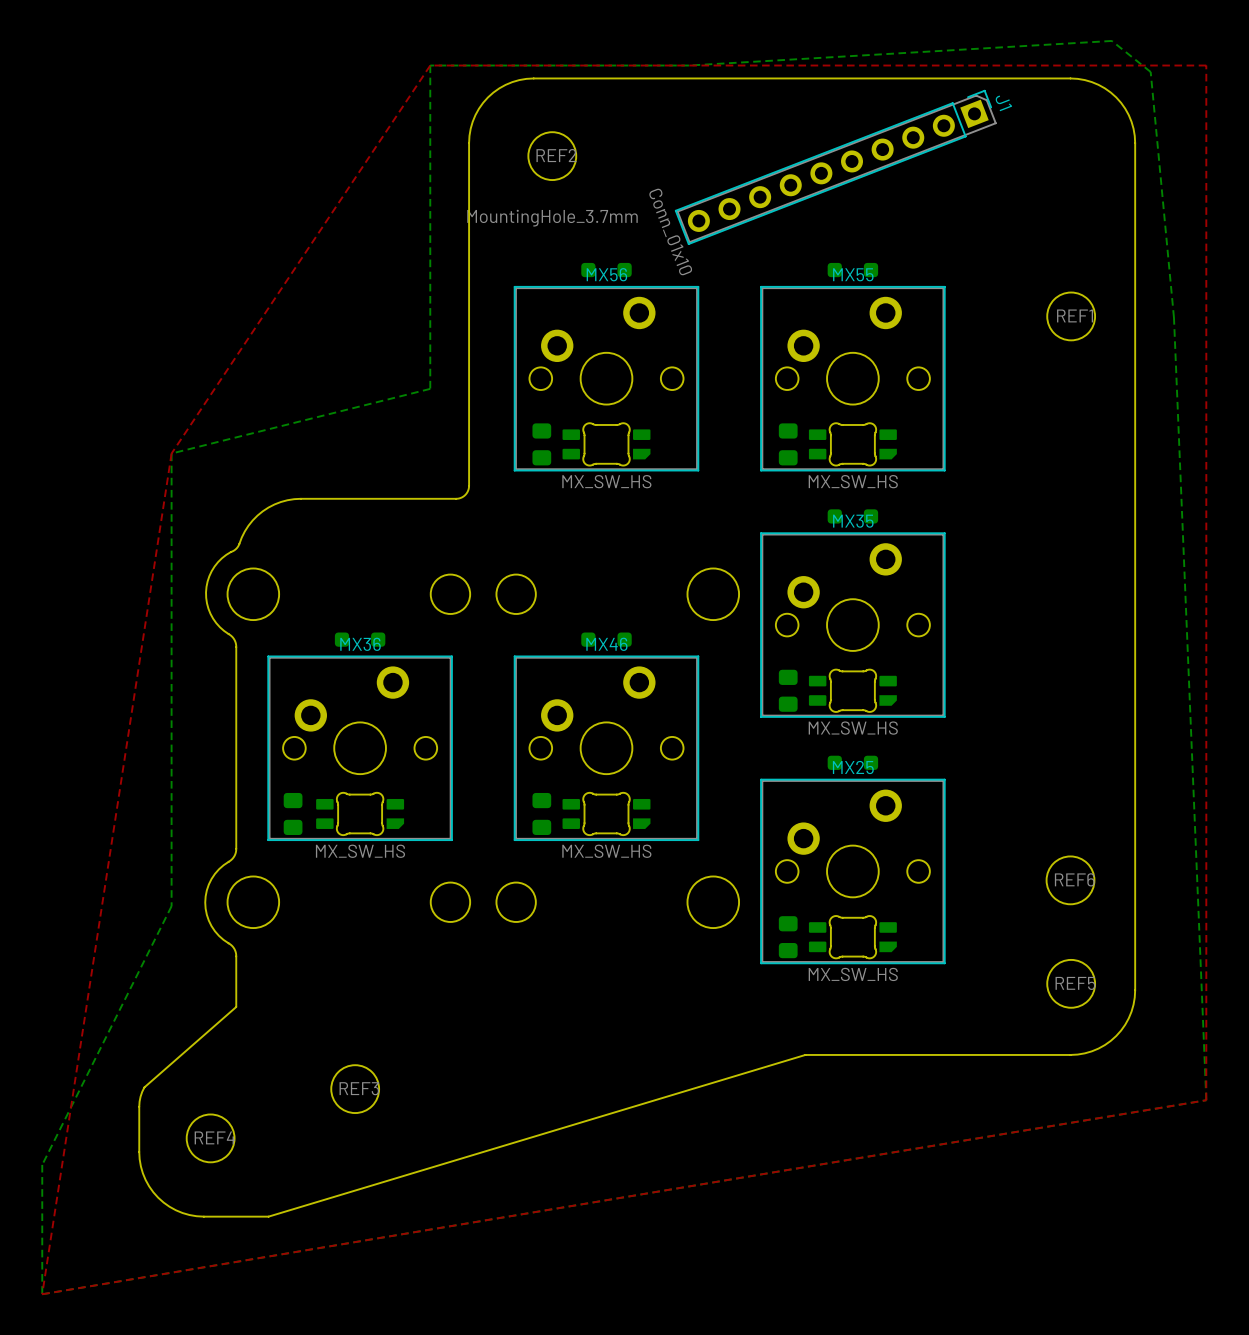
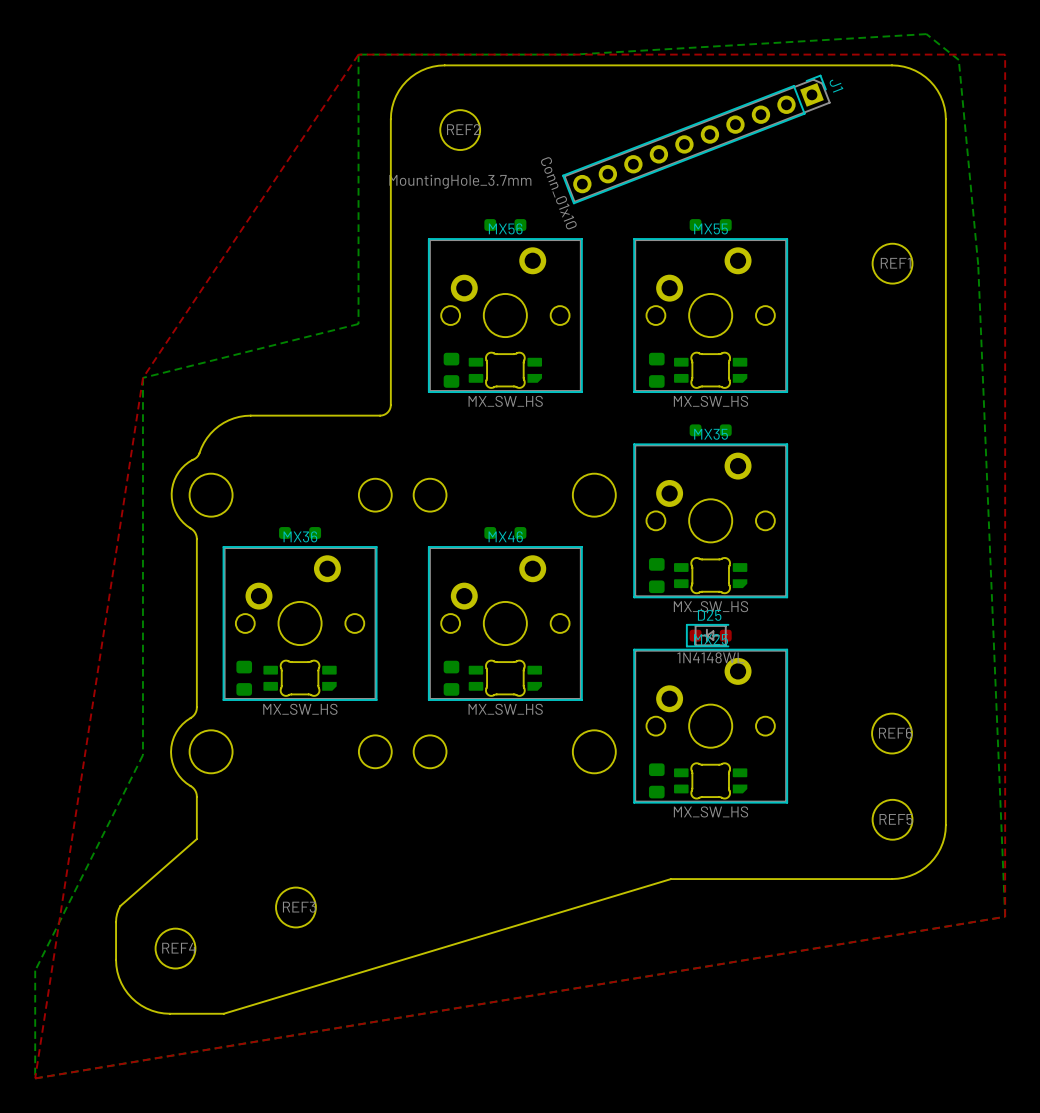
D25 side: bottom (852, 762) -> top (708, 635)

